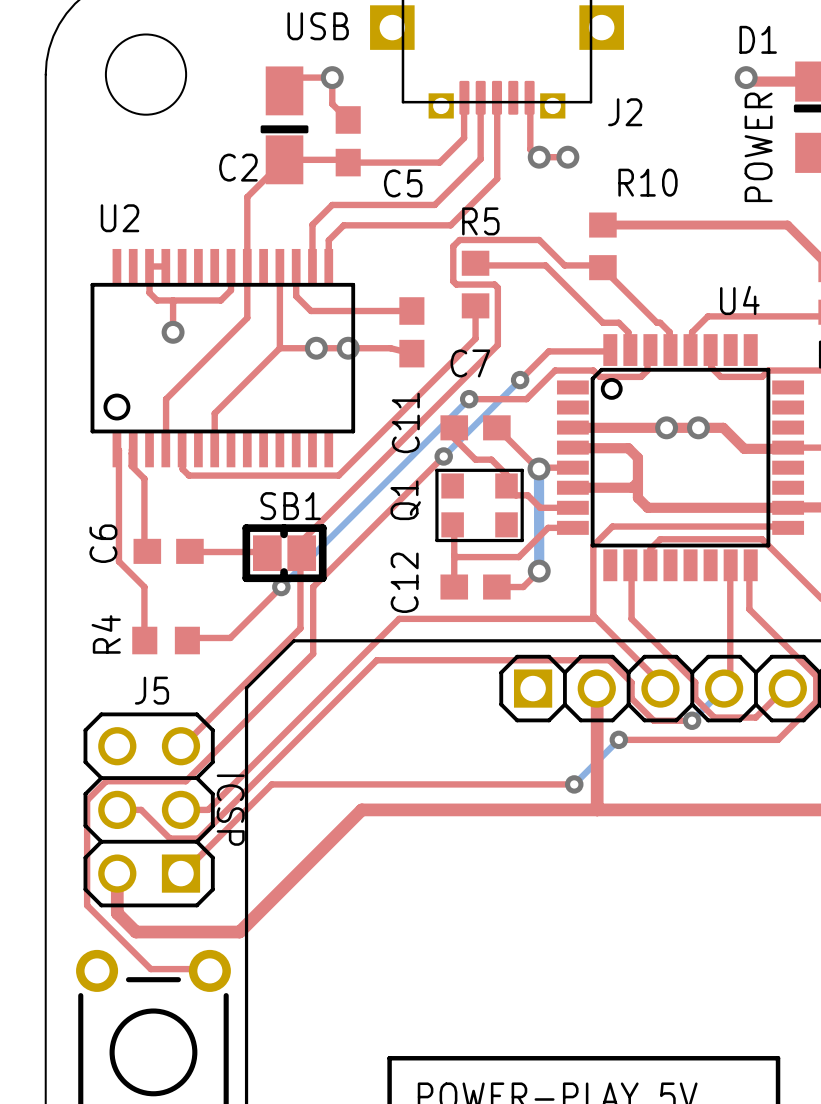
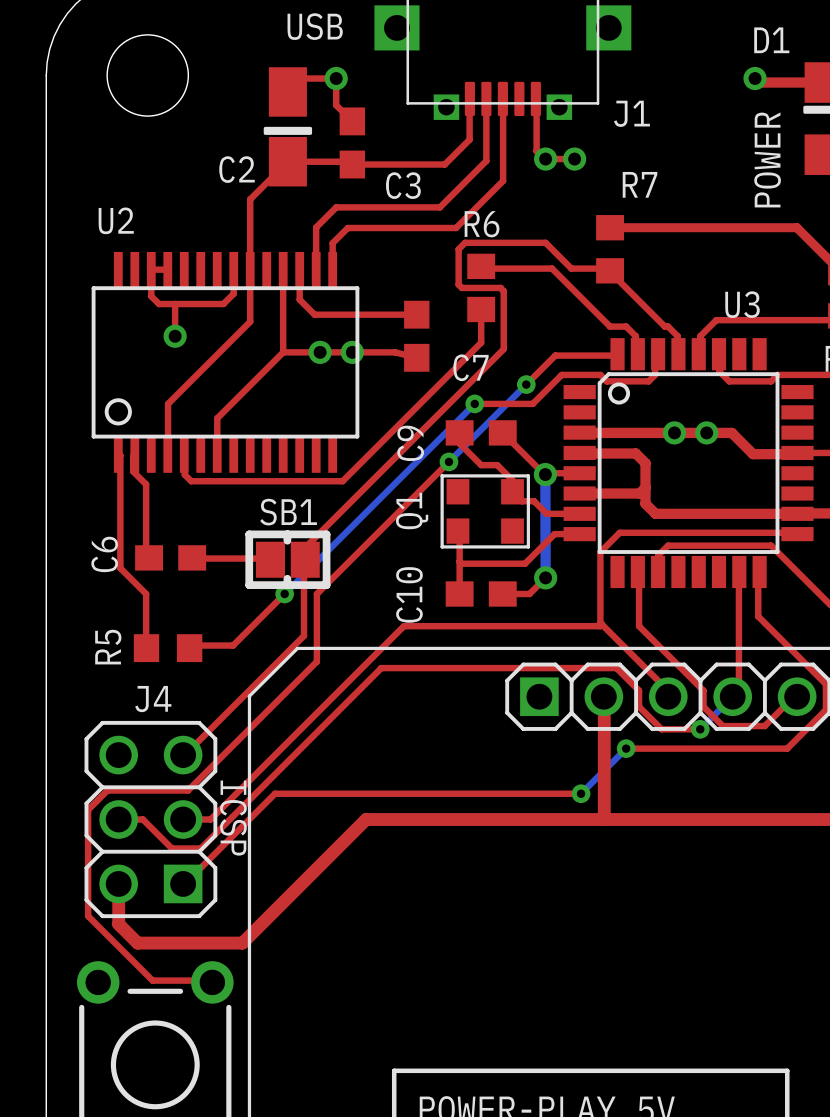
J2 name: J2 (625, 112) -> J1 (631, 113)
R10 name: R10 (647, 182) -> R7 (640, 184)
C5 name: C5 (403, 183) -> C3 (403, 185)
R5 name: R5 (480, 221) -> R6 (482, 224)
U4 name: U4 (739, 300) -> U3 (742, 304)
C11 name: C11 (405, 422) -> C9 (410, 443)
C12 name: C12 (404, 582) -> C10 (409, 594)
R4 name: R4 (106, 634) -> R5 (108, 647)
J5 name: J5 (152, 690) -> J4 (153, 699)

